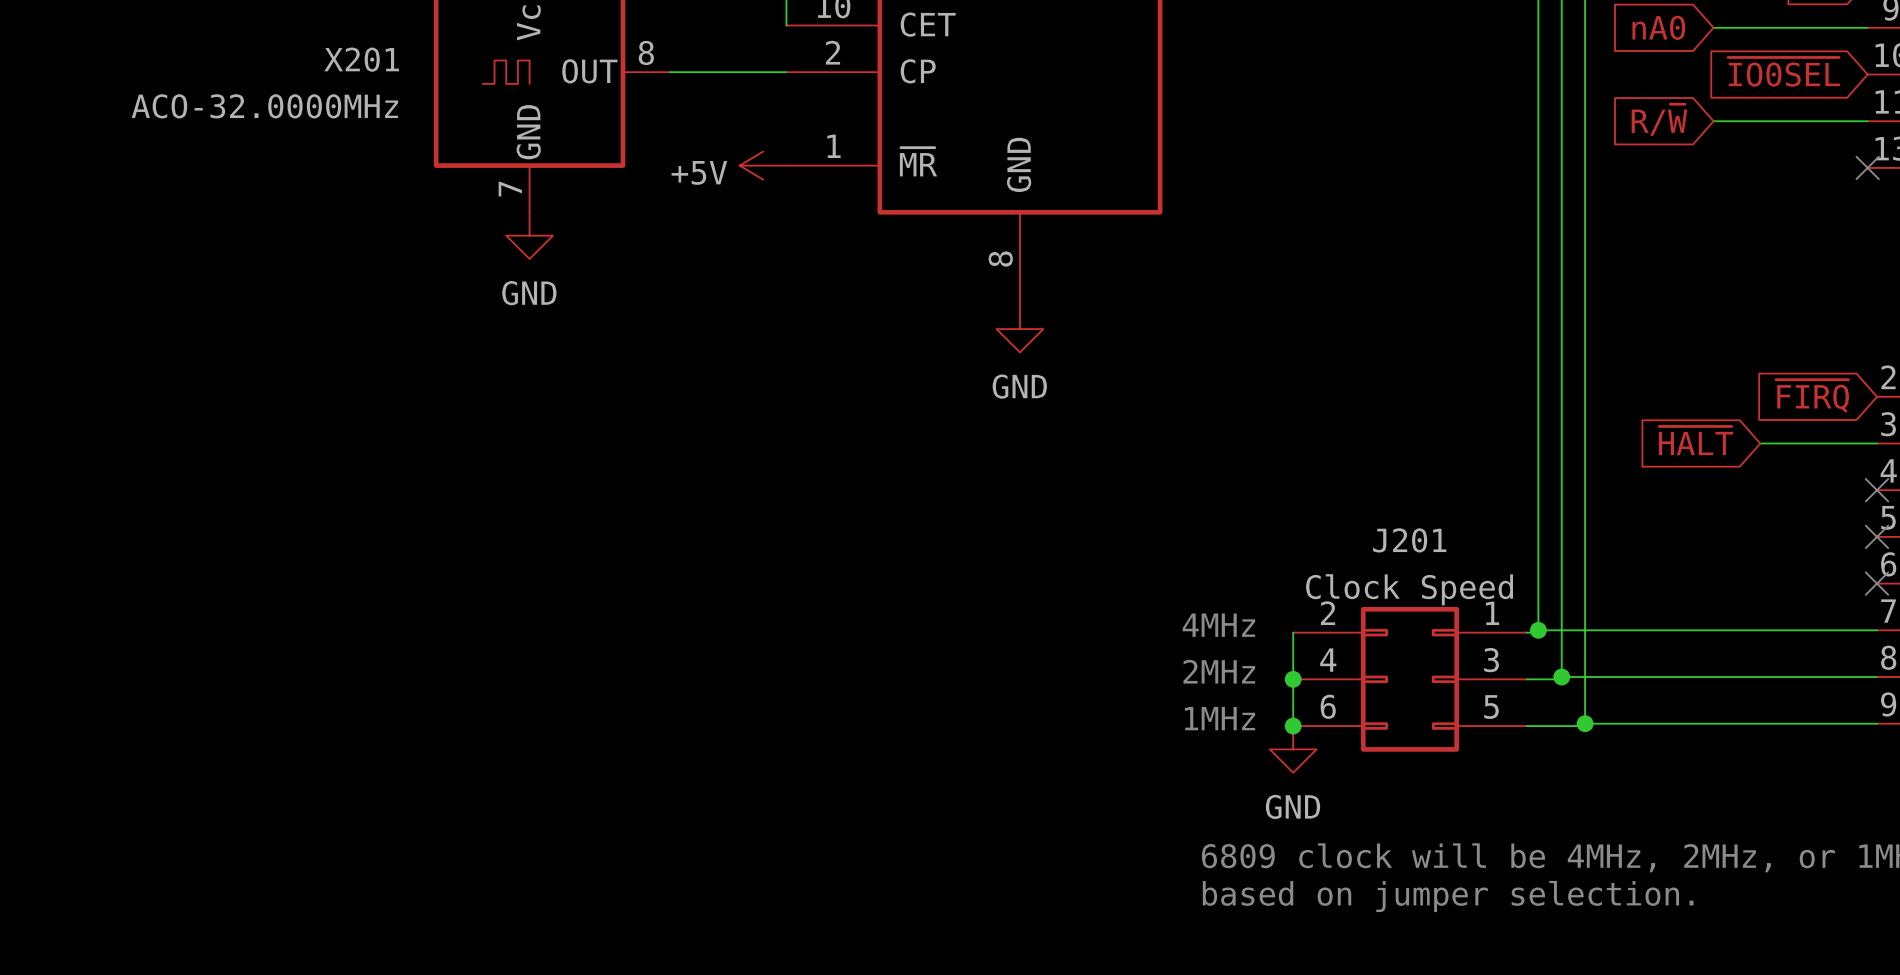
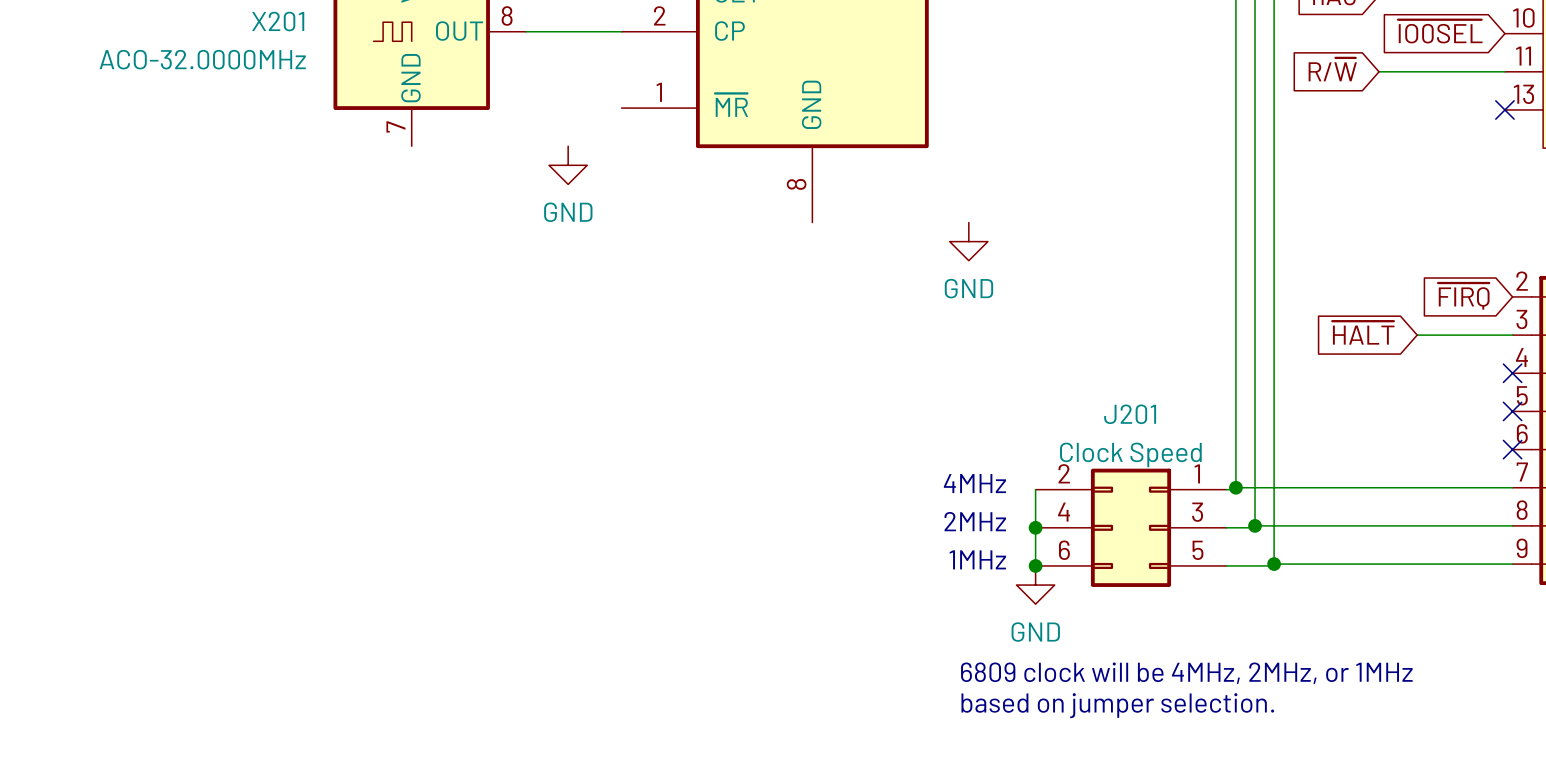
power symbol: +5V (763, 165) -> none
power symbol: GND (529, 235) -> none
power symbol: none -> GND (568, 165)
power symbol: GND (1019, 329) -> none
power symbol: none -> GND (968, 241)

